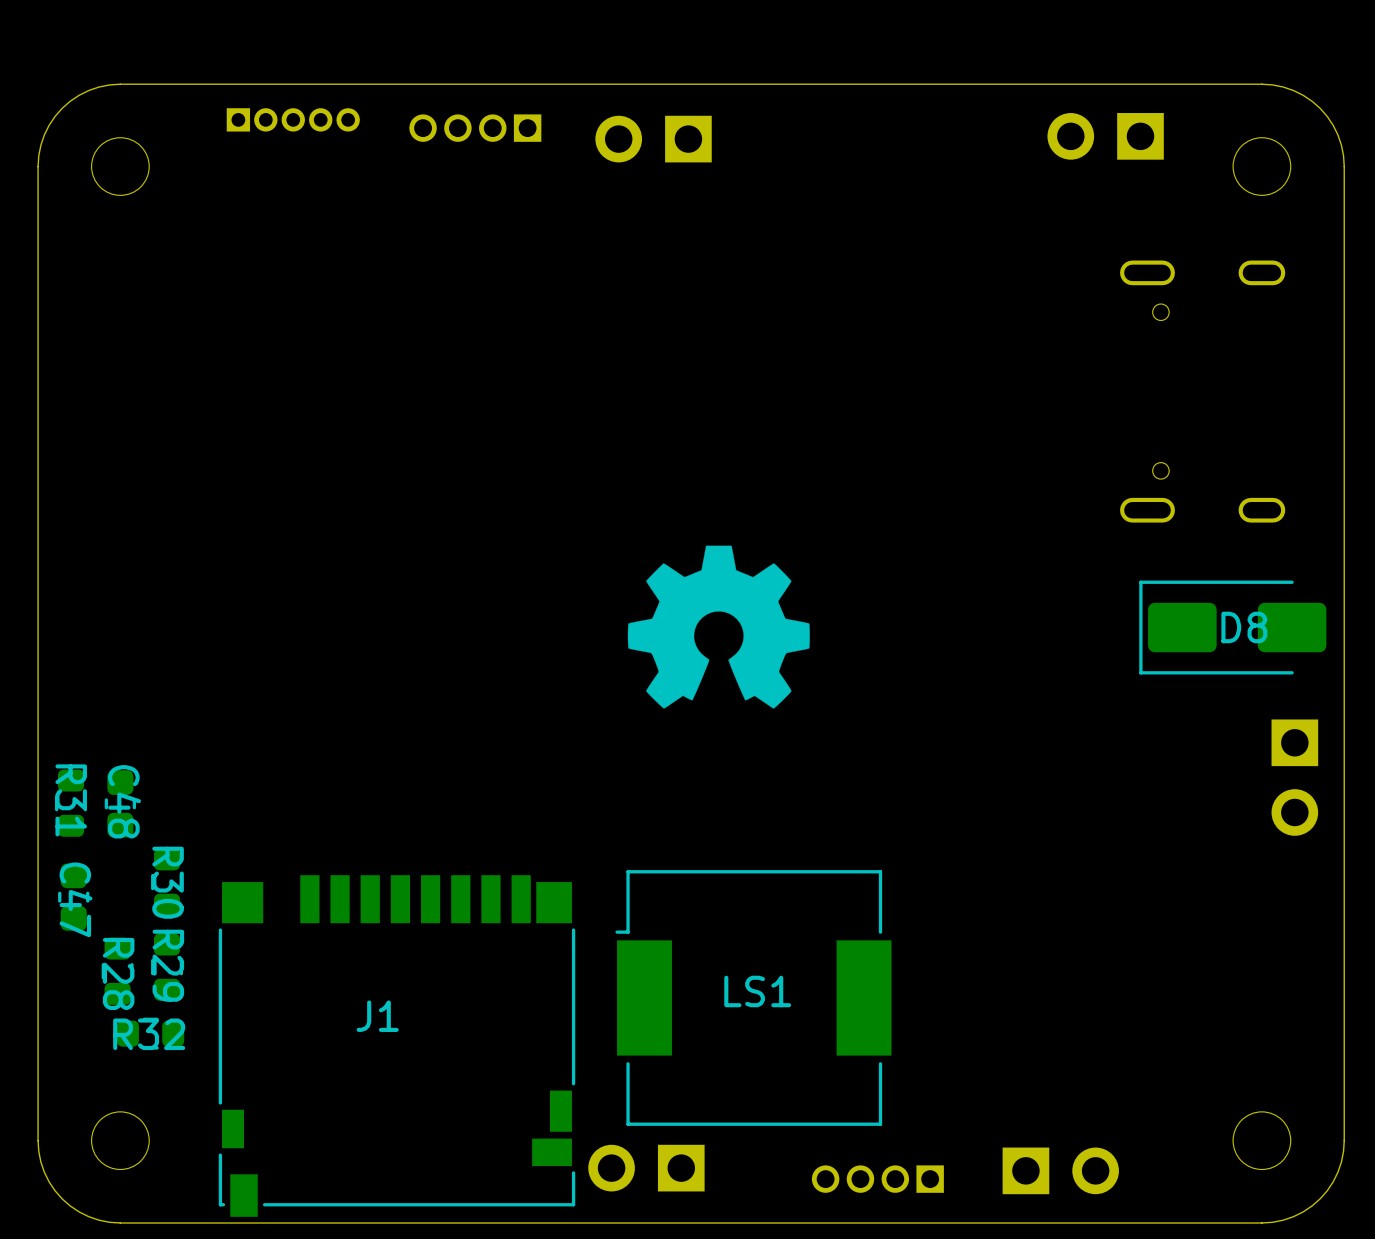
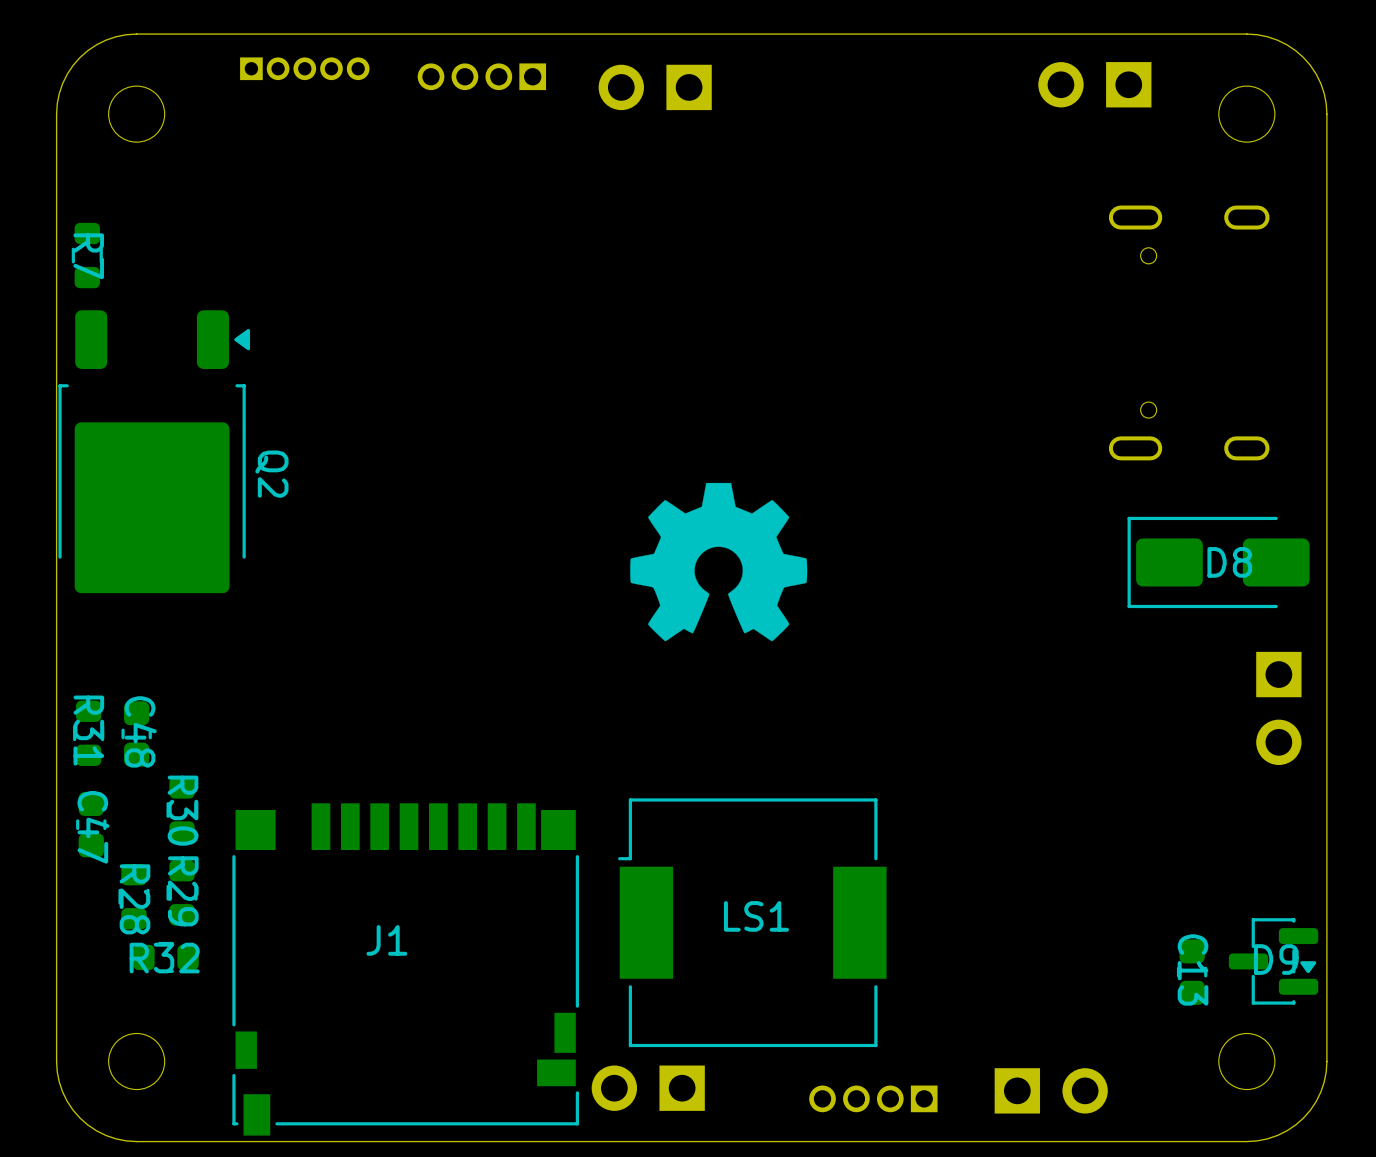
R7: none -> (87, 255)
Q2: none -> (154, 451)
D9: none -> (1273, 961)
C13: none -> (1192, 972)

